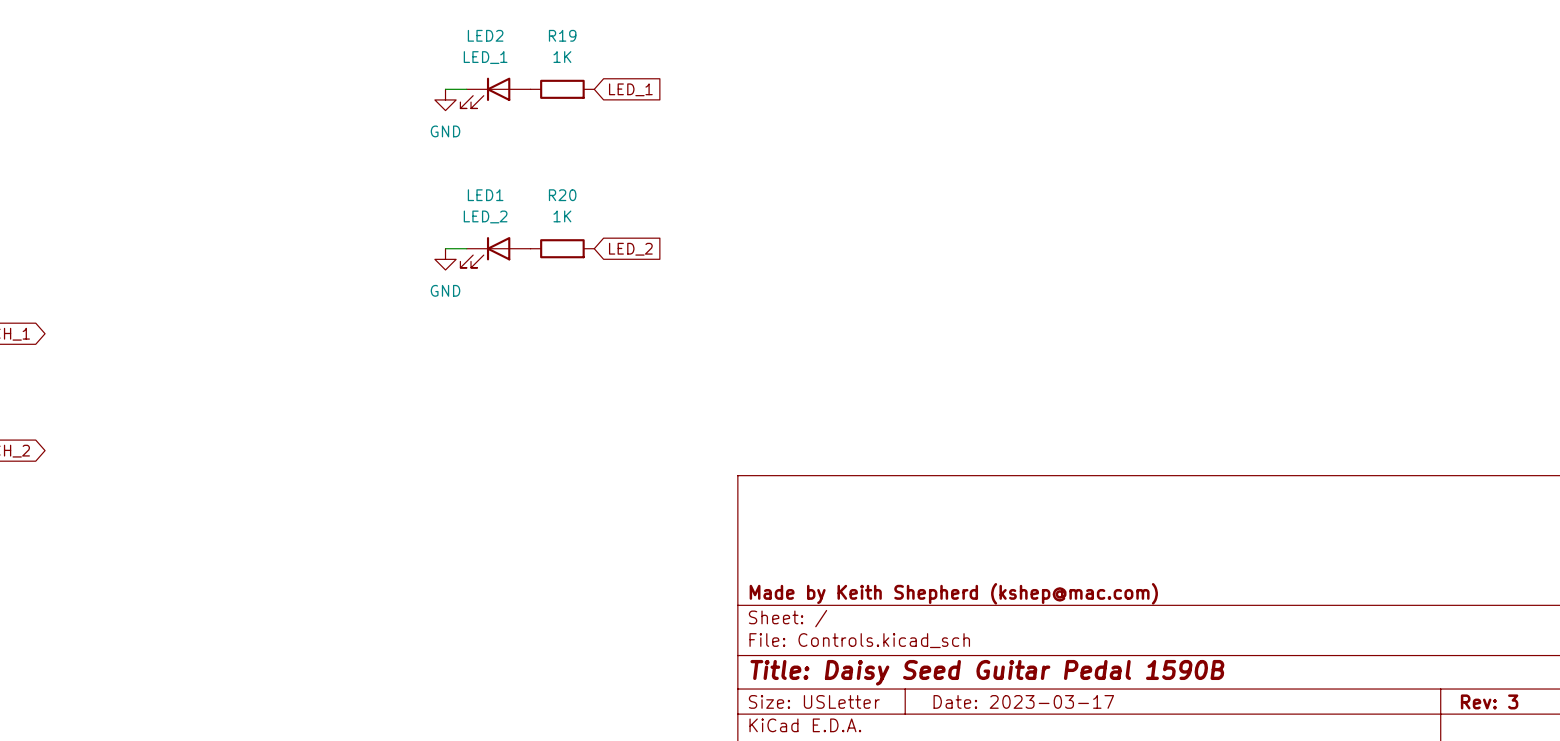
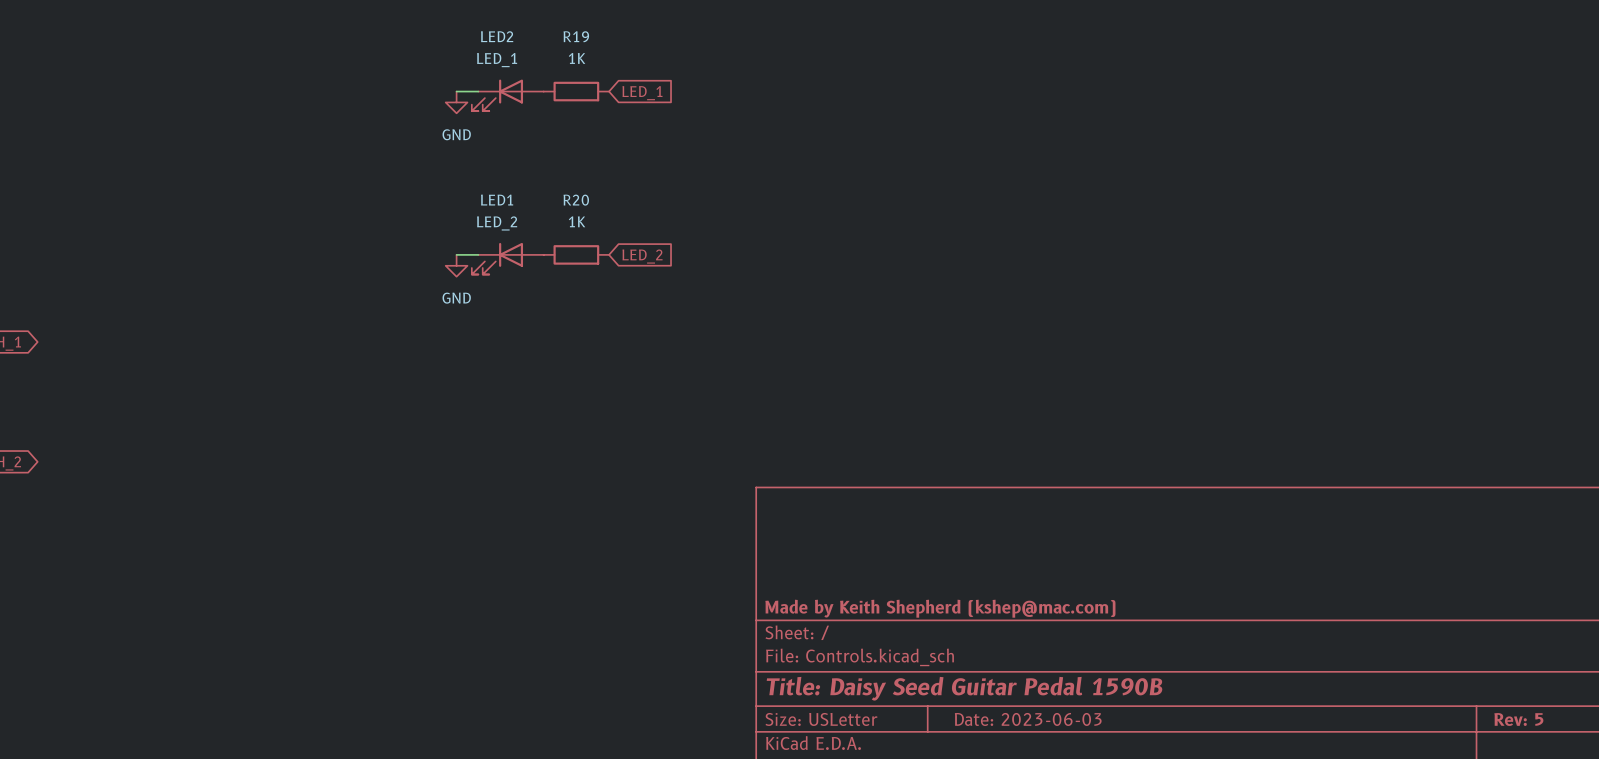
title block: Date: 2023-03-17 (1023, 701) -> Date: 2023-06-03 (1028, 719)
title block: Rev: 3 (1489, 701) -> Rev: 5 (1518, 719)

